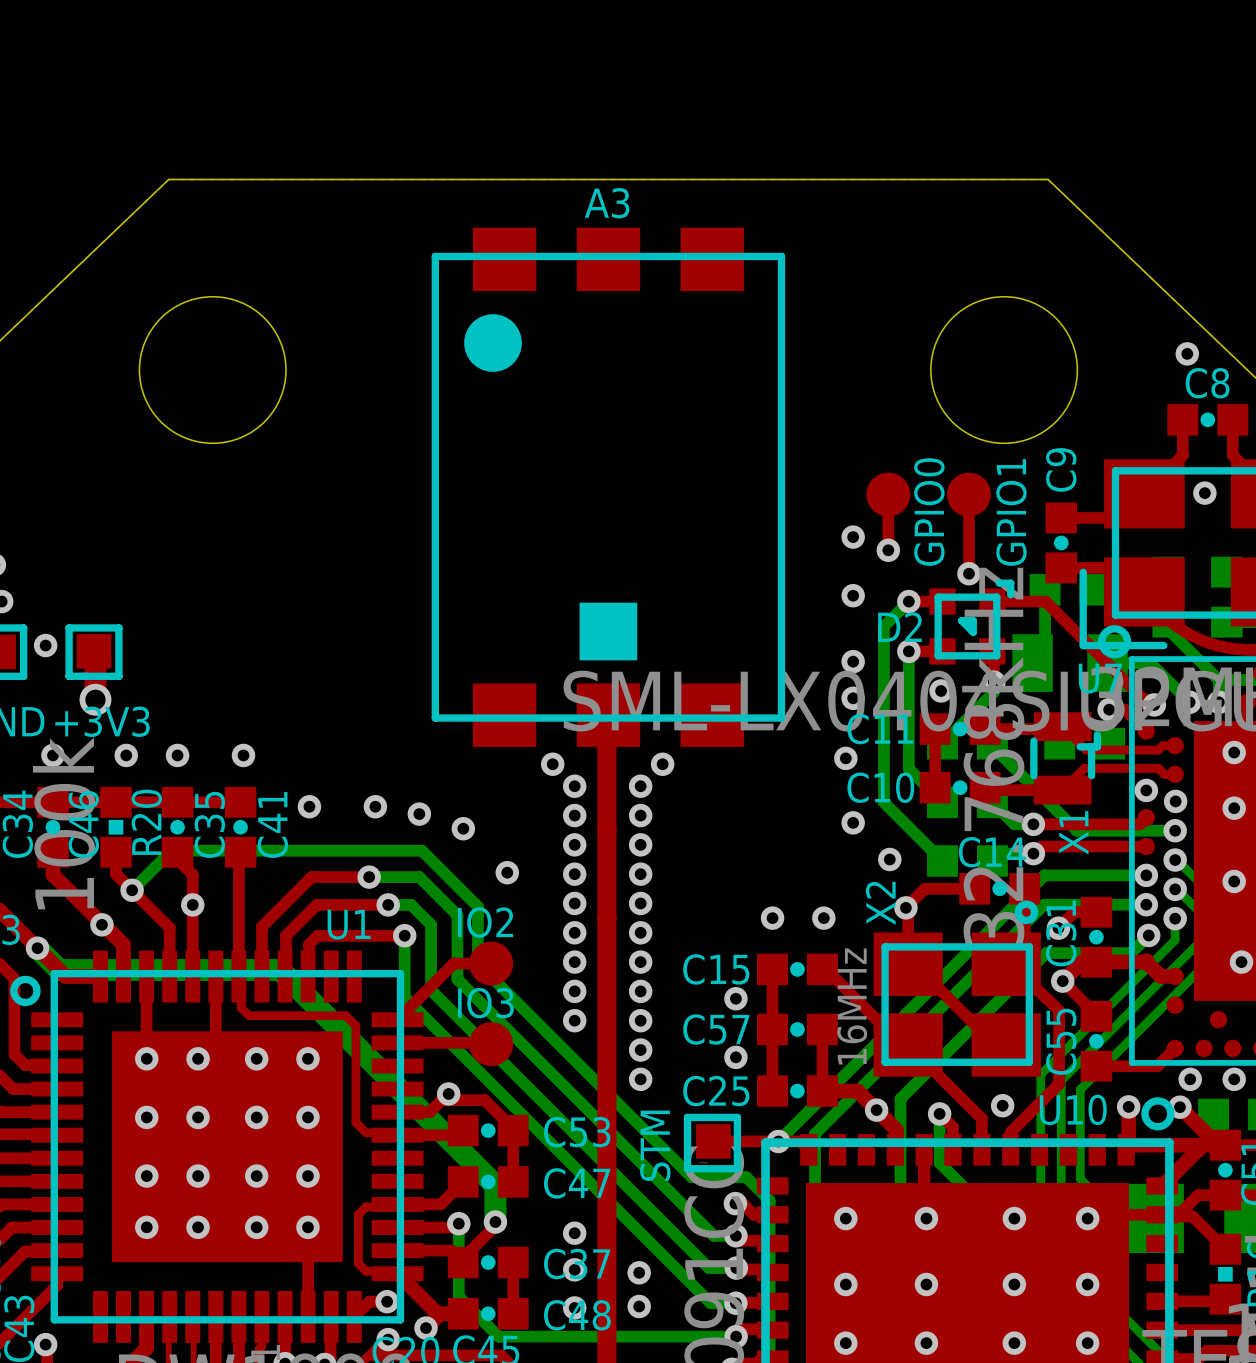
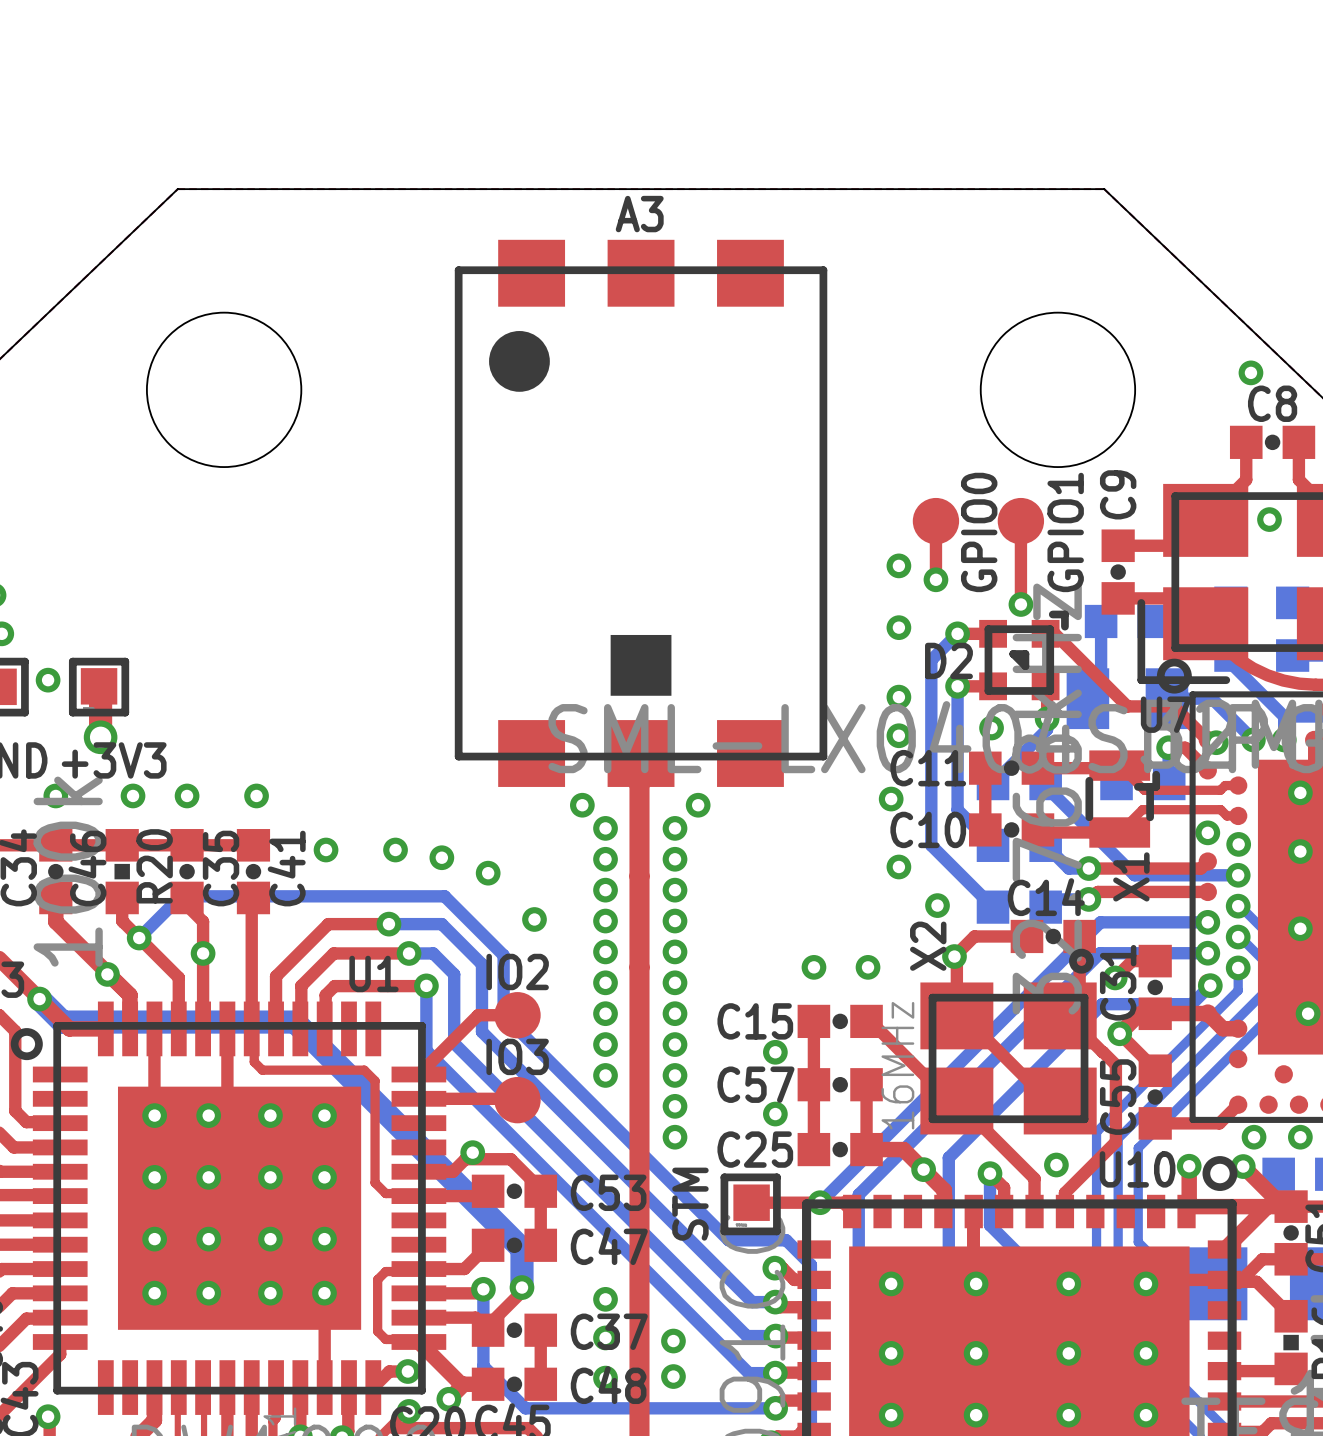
top track: (1001, 601) (1045, 601) (1146, 702) -> (1054, 633) (1127, 706) (1173, 706) (1207, 739)

